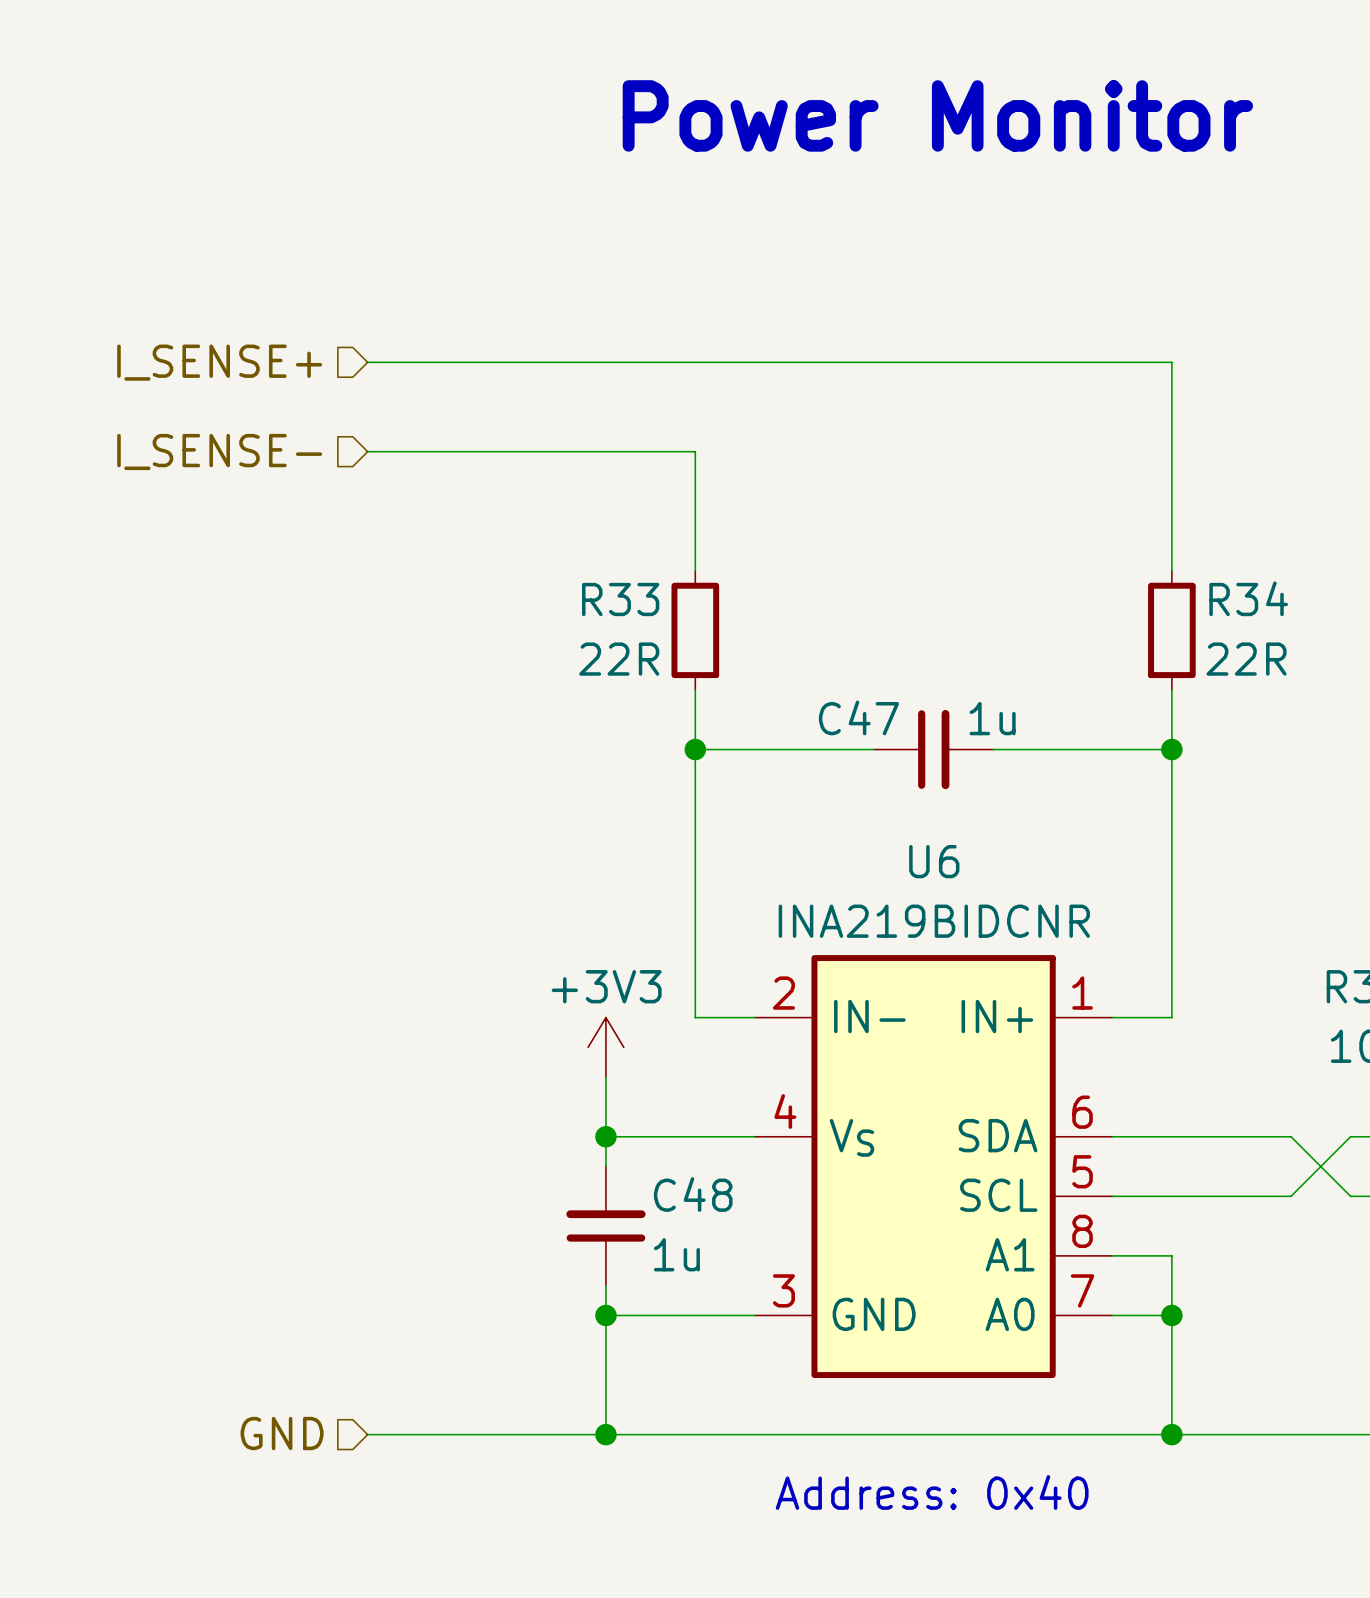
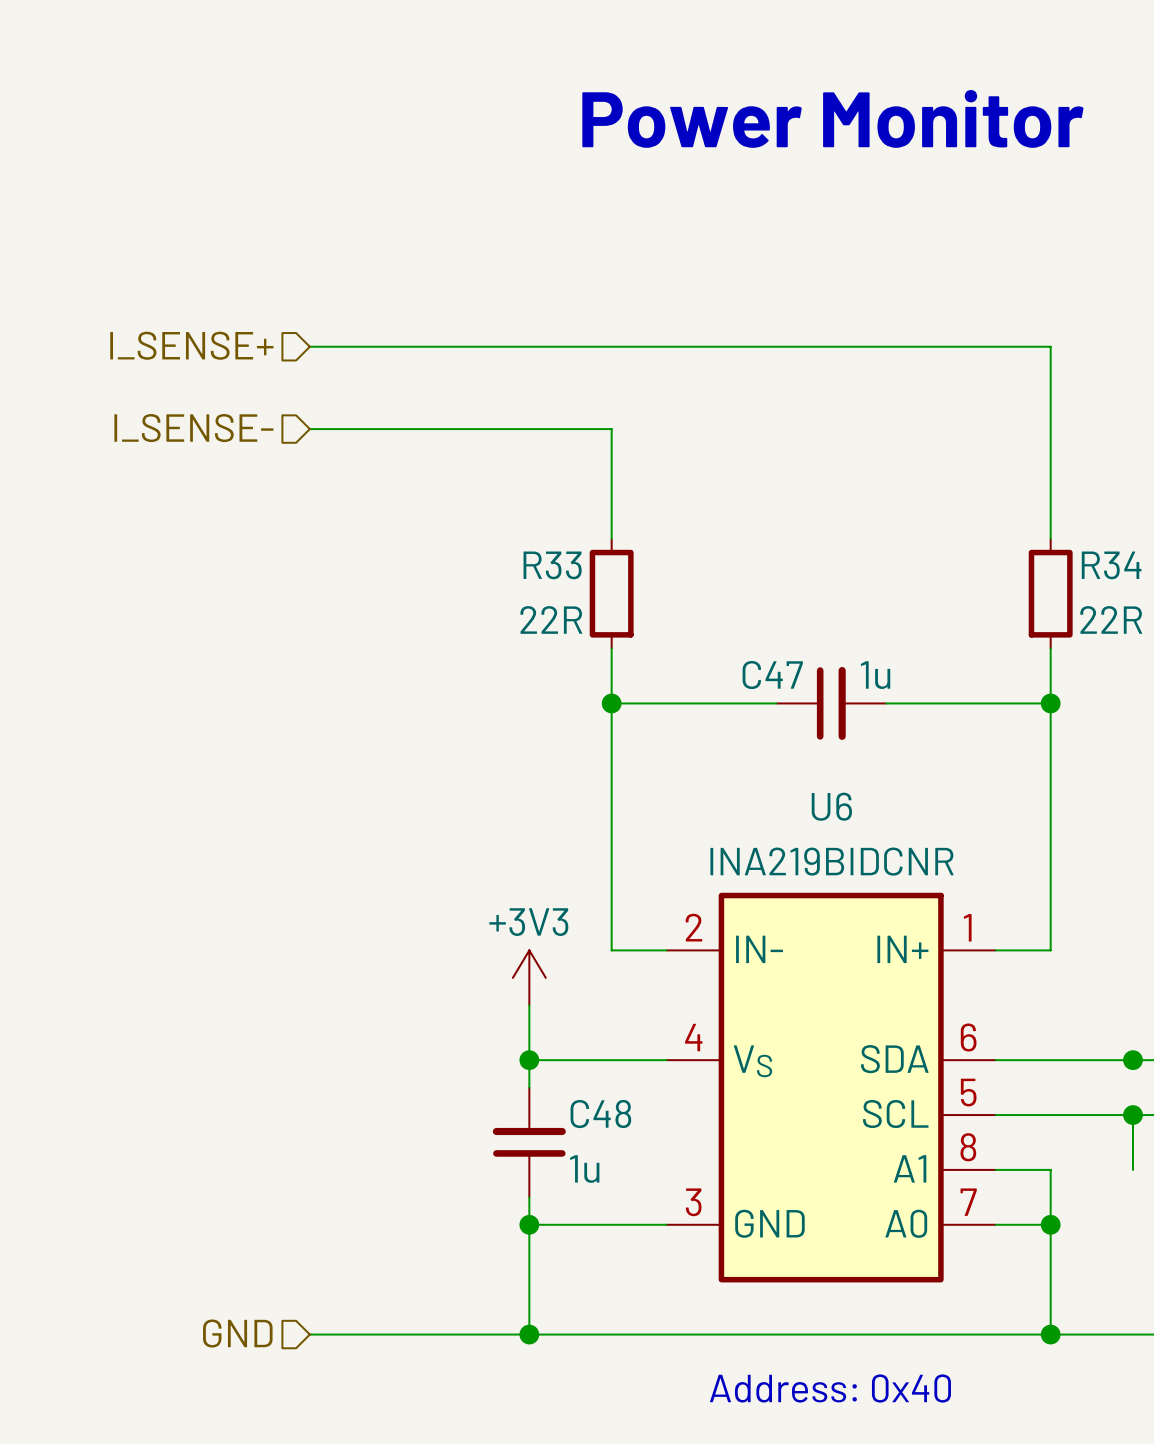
junction: none -> (1132, 1060)
wire: none -> (1132, 1115) (1132, 1169)
junction: none -> (1132, 1115)

